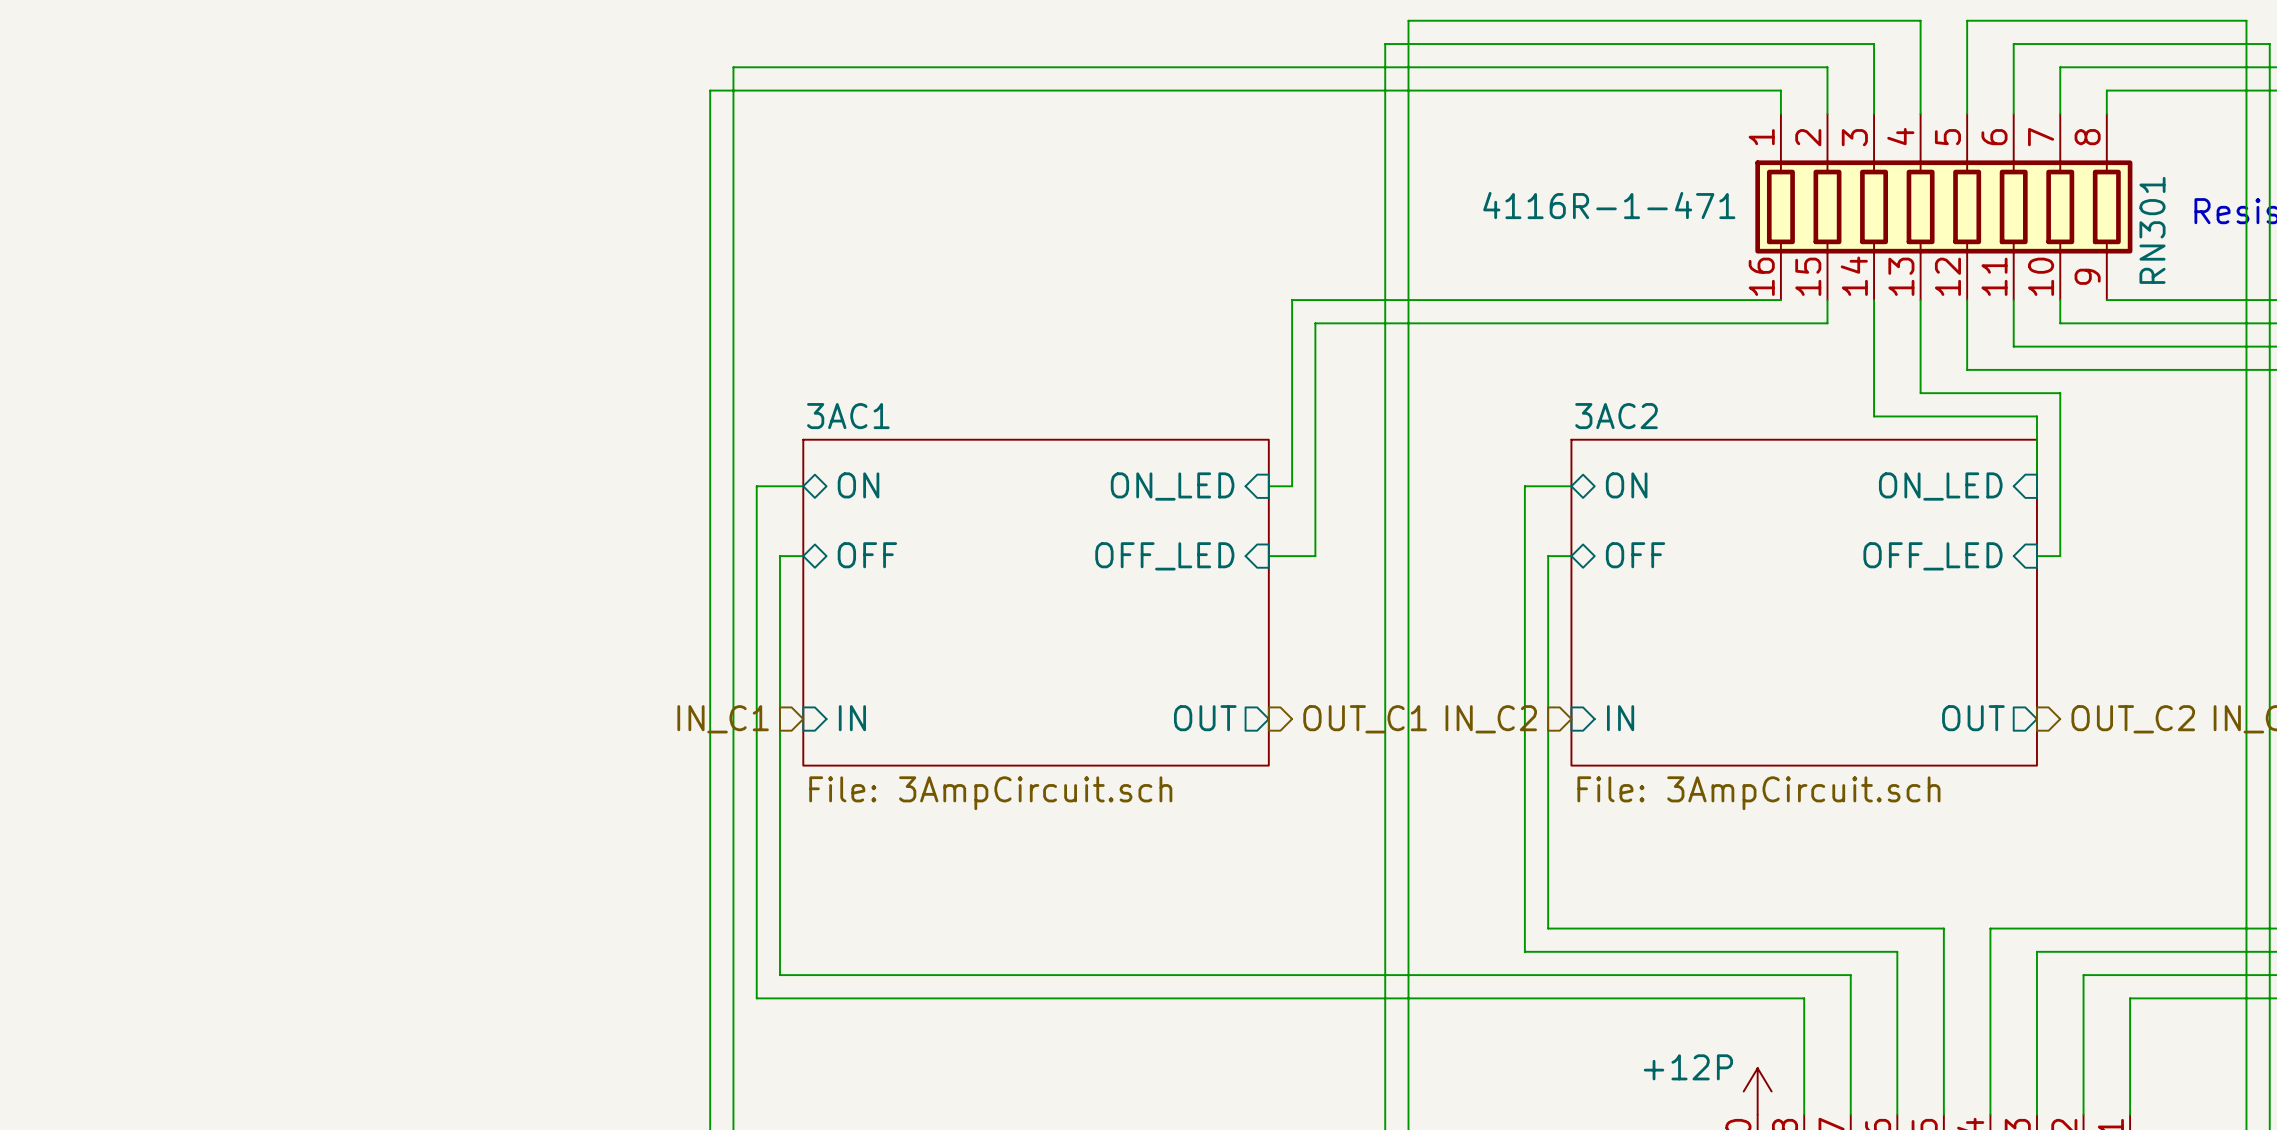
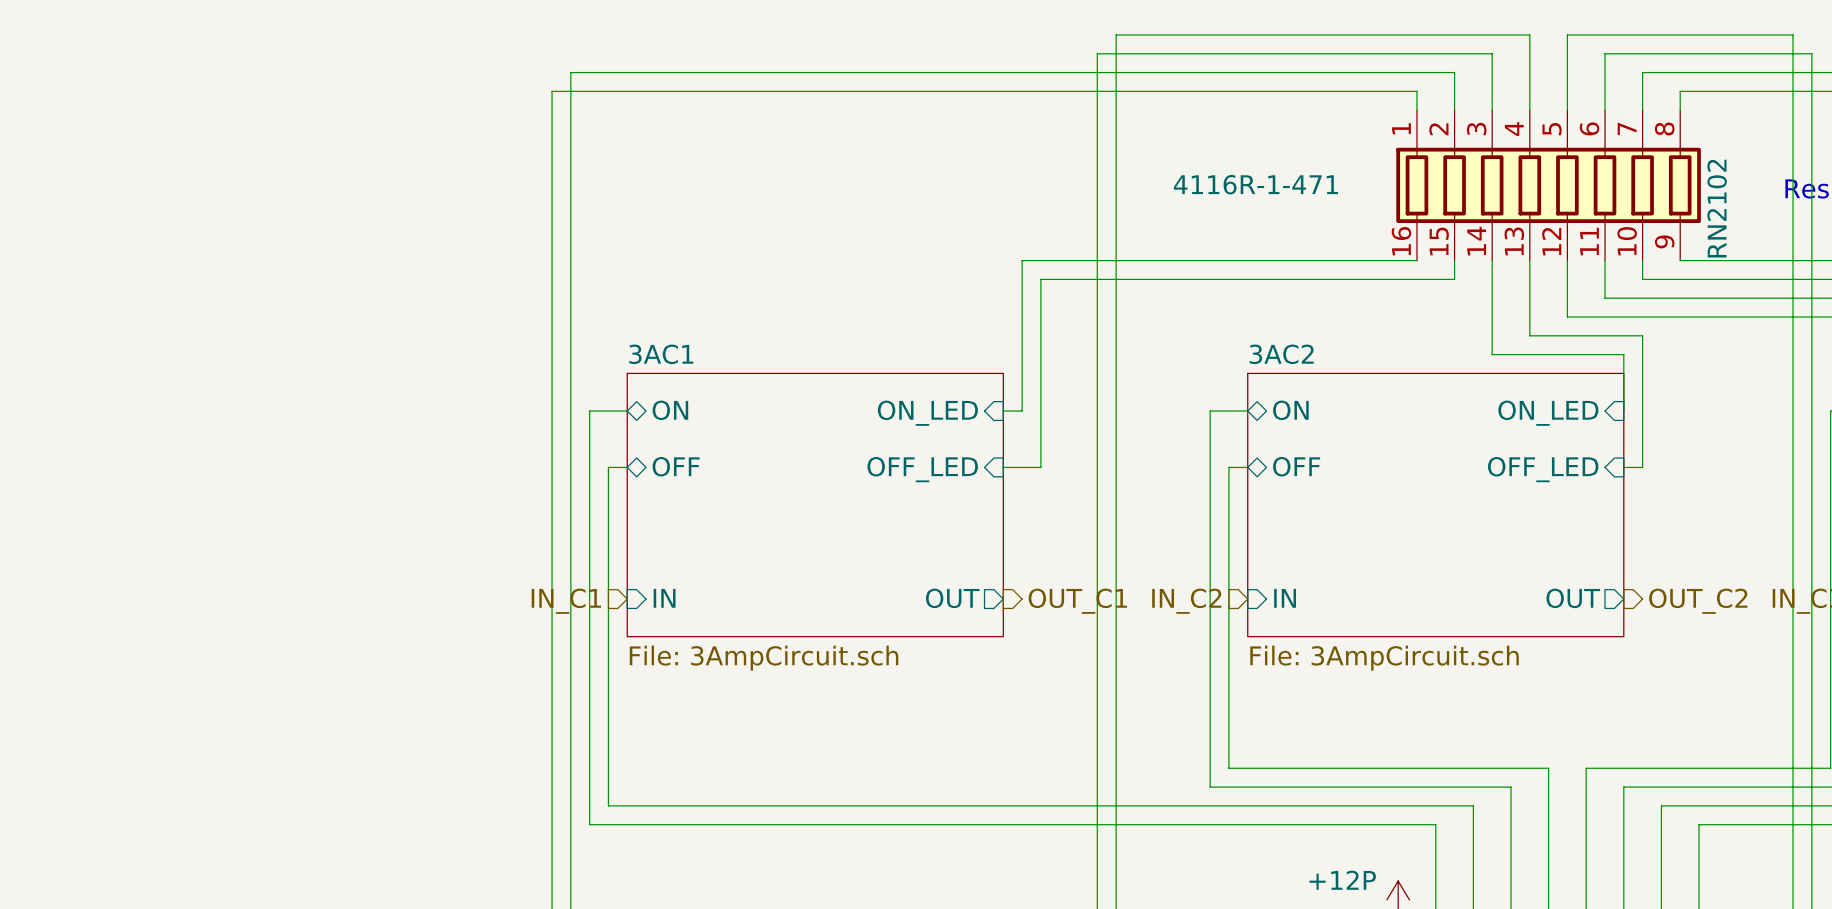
RN301 name: RN301 (2152, 230) -> RN2102 (1717, 208)

